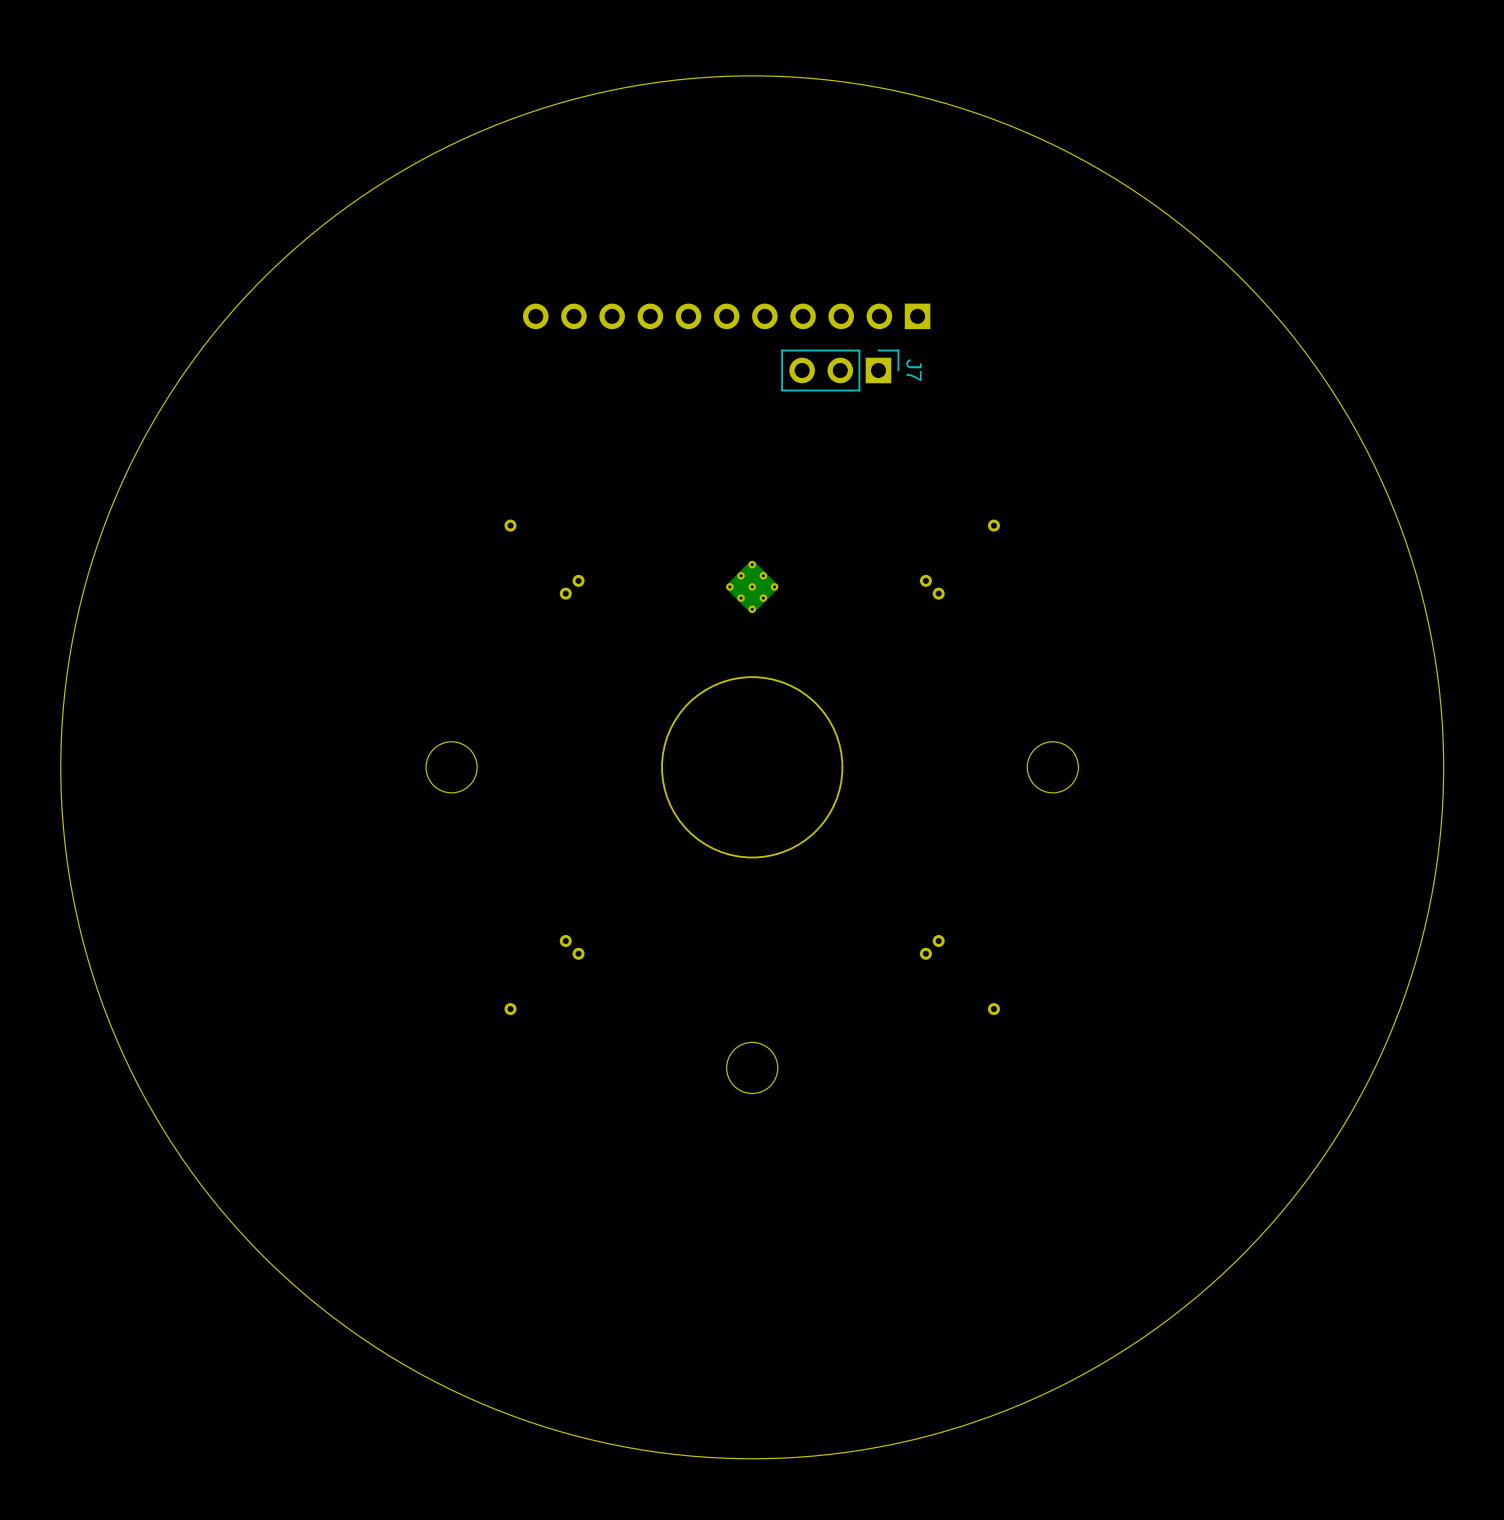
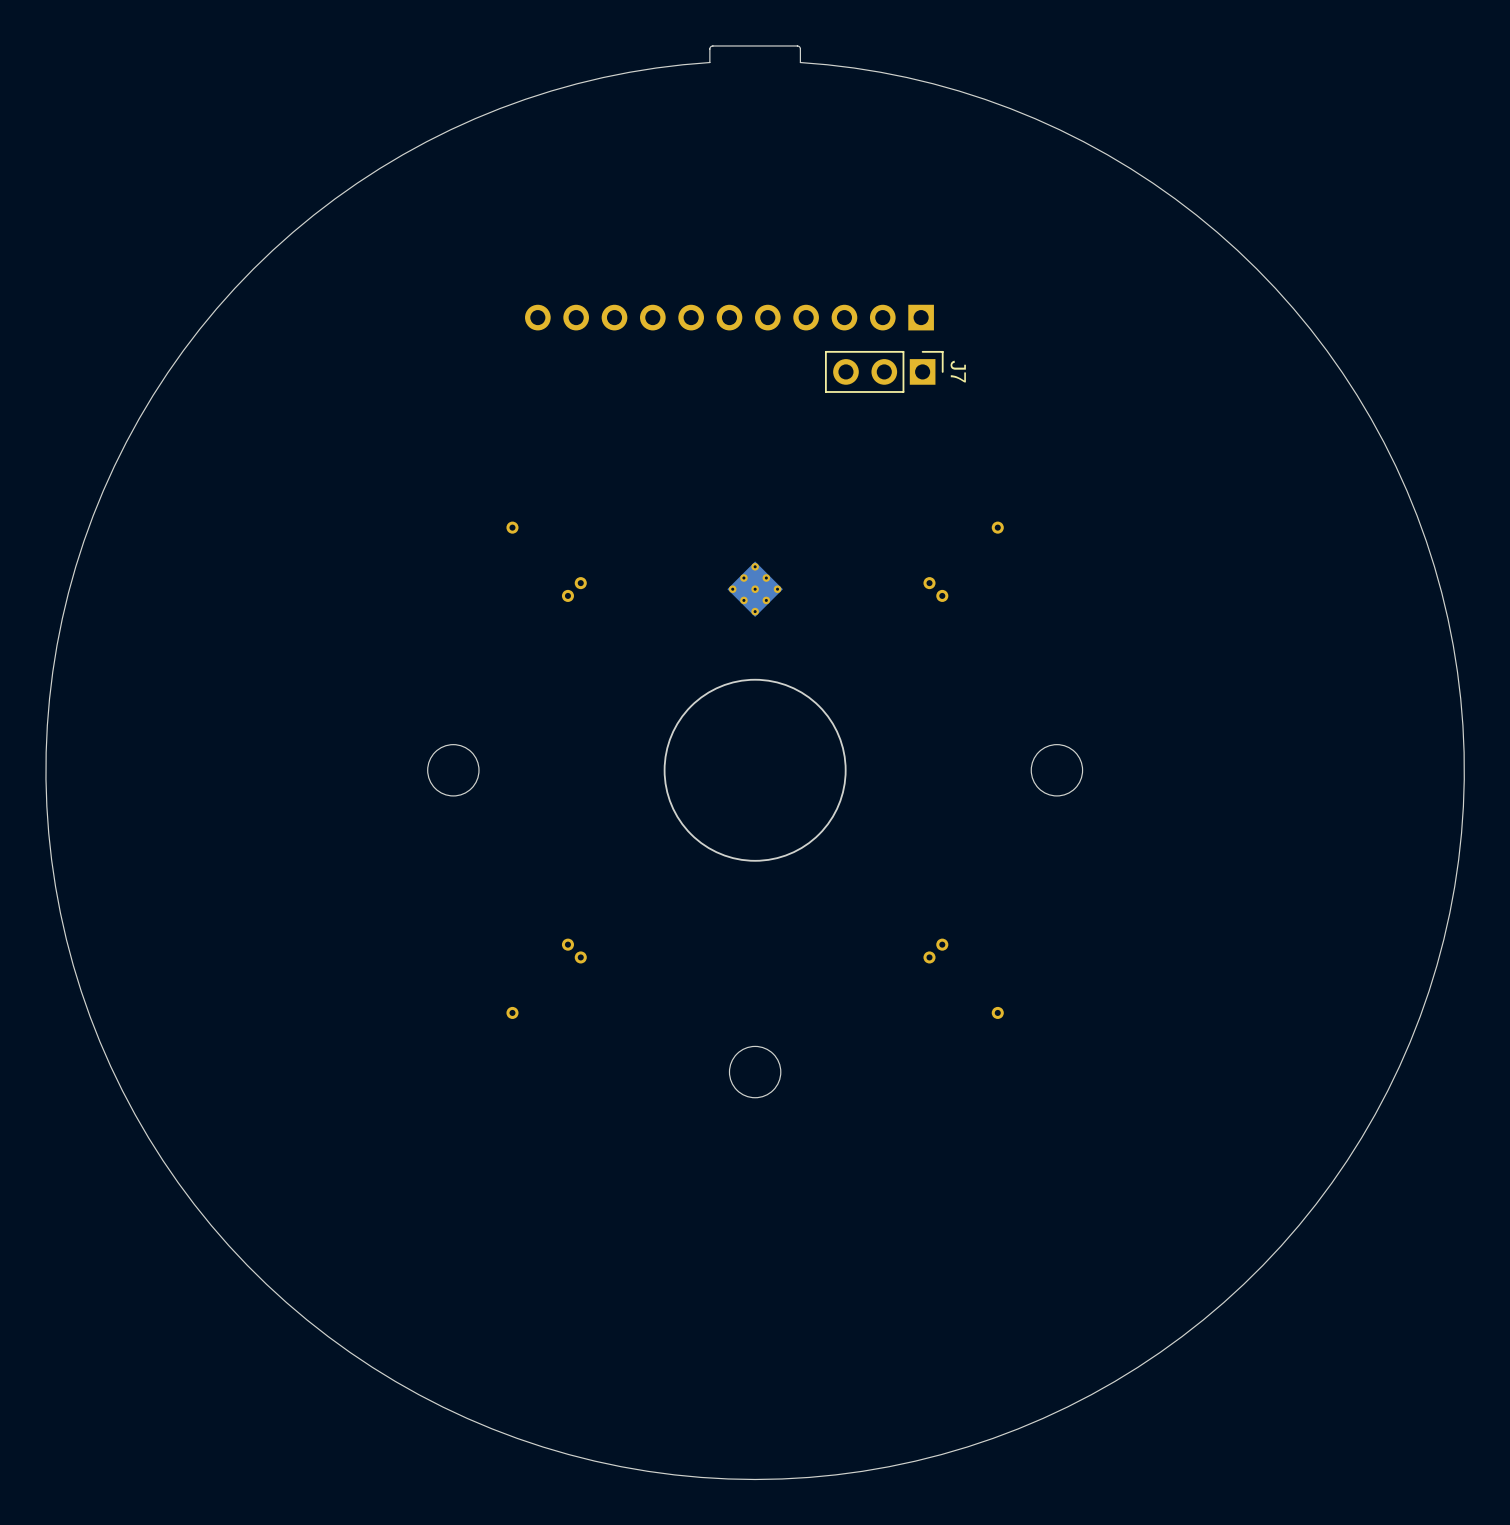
board edge: none -> (797, 45) (712, 46) (709, 48) (709, 62) (656, 68) (603, 77) (551, 91) (500, 108) (450, 129) (379, 168) (335, 198) (272, 250) (216, 308) (183, 350) (139, 418) (114, 466) (83, 541) (68, 592) (52, 671) (47, 725) (45, 779) (51, 860) (60, 913) (81, 991) (99, 1041) (135, 1114) (178, 1182) (228, 1245) (286, 1302) (328, 1336) (395, 1381) (442, 1407) (517, 1438) (568, 1454) (621, 1466) (701, 1477) (782, 1478) (862, 1471) (941, 1454) (992, 1438) (1067, 1407) (1114, 1381) (1160, 1352) (1223, 1302) (1262, 1265) (1315, 1204) (1361, 1137) (1387, 1090) (1420, 1016) (1436, 965) (1454, 886) (1463, 806) (1464, 752) (1457, 671) (1448, 618) (1426, 541) (1406, 490) (1370, 418) (1326, 350) (1293, 308) (1256, 269) (1196, 215) (1153, 183) (1083, 141) (1010, 108) (933, 83) (880, 72) (800, 62) (800, 48) (797, 45)
round board edge: [60, 75, 1445, 1460] -> none
J7 position: (840, 370) -> (884, 371)
part footprint: [726, 560, 779, 614] -> [727, 561, 783, 617]

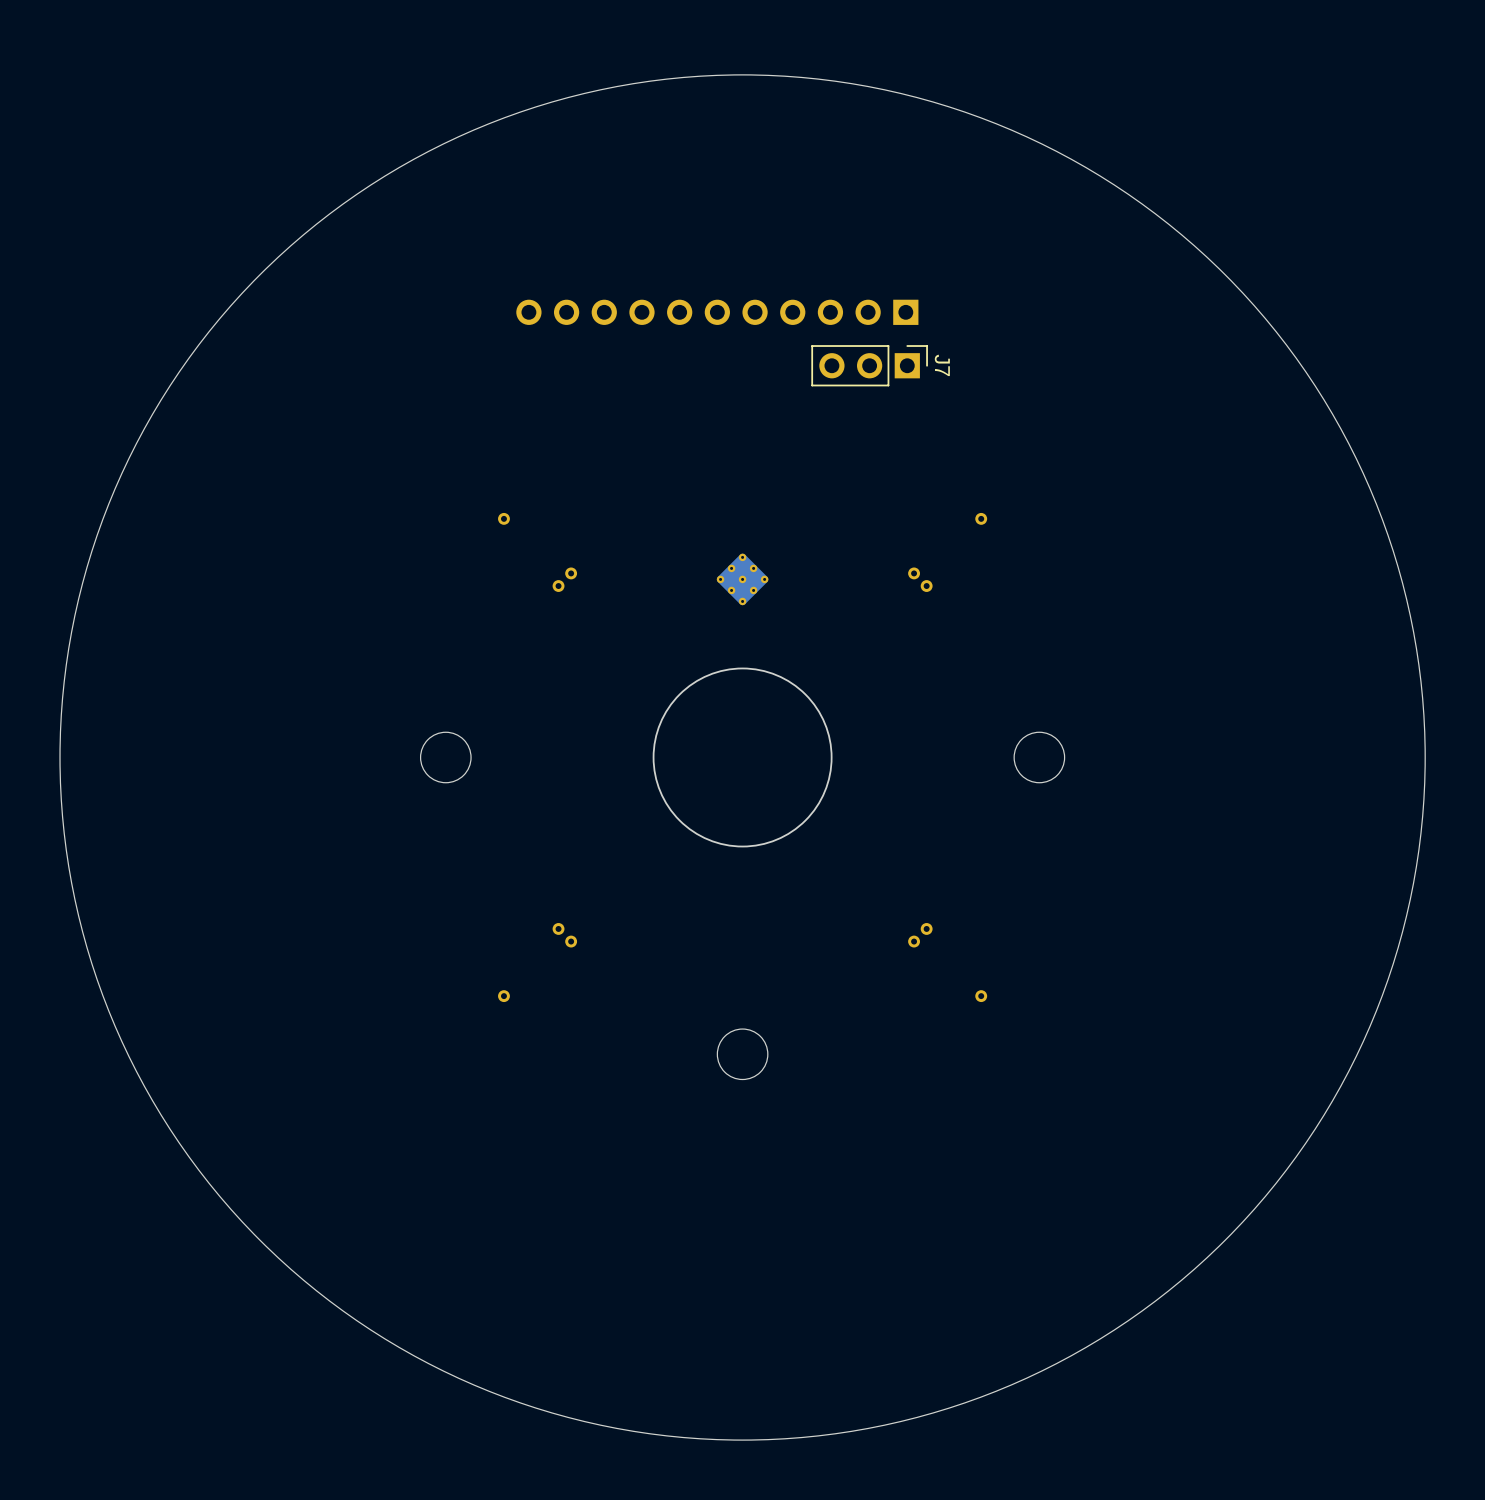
board edge: (797, 45) (712, 46) (709, 48) (709, 62) (656, 68) (603, 77) (551, 91) (500, 108) (450, 129) (379, 168) (335, 198) (272, 250) (216, 308) (183, 350) (139, 418) (114, 466) (83, 541) (68, 592) (52, 671) (47, 725) (45, 779) (51, 860) (60, 913) (81, 991) (99, 1041) (135, 1114) (178, 1182) (228, 1245) (286, 1302) (328, 1336) (395, 1381) (442, 1407) (517, 1438) (568, 1454) (621, 1466) (701, 1477) (782, 1478) (862, 1471) (941, 1454) (992, 1438) (1067, 1407) (1114, 1381) (1160, 1352) (1223, 1302) (1262, 1265) (1315, 1204) (1361, 1137) (1387, 1090) (1420, 1016) (1436, 965) (1454, 886) (1463, 806) (1464, 752) (1457, 671) (1448, 618) (1426, 541) (1406, 490) (1370, 418) (1326, 350) (1293, 308) (1256, 269) (1196, 215) (1153, 183) (1083, 141) (1010, 108) (933, 83) (880, 72) (800, 62) (800, 48) (797, 45) -> none
round board edge: none -> [59, 74, 1426, 1441]
part footprint: [727, 561, 783, 617] -> [716, 553, 769, 606]

